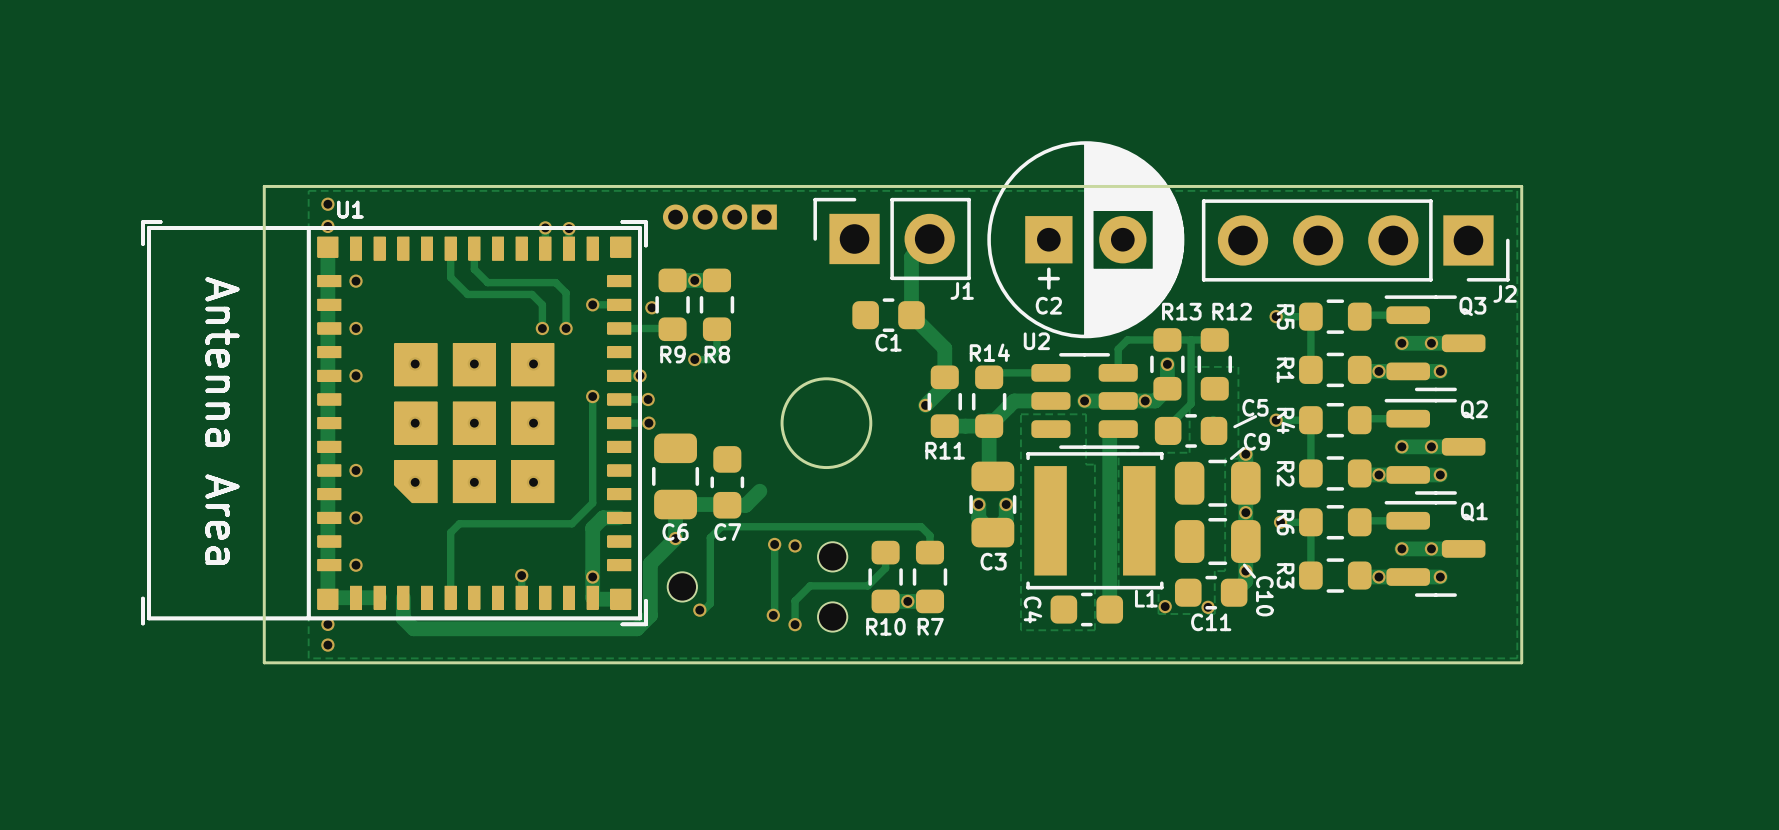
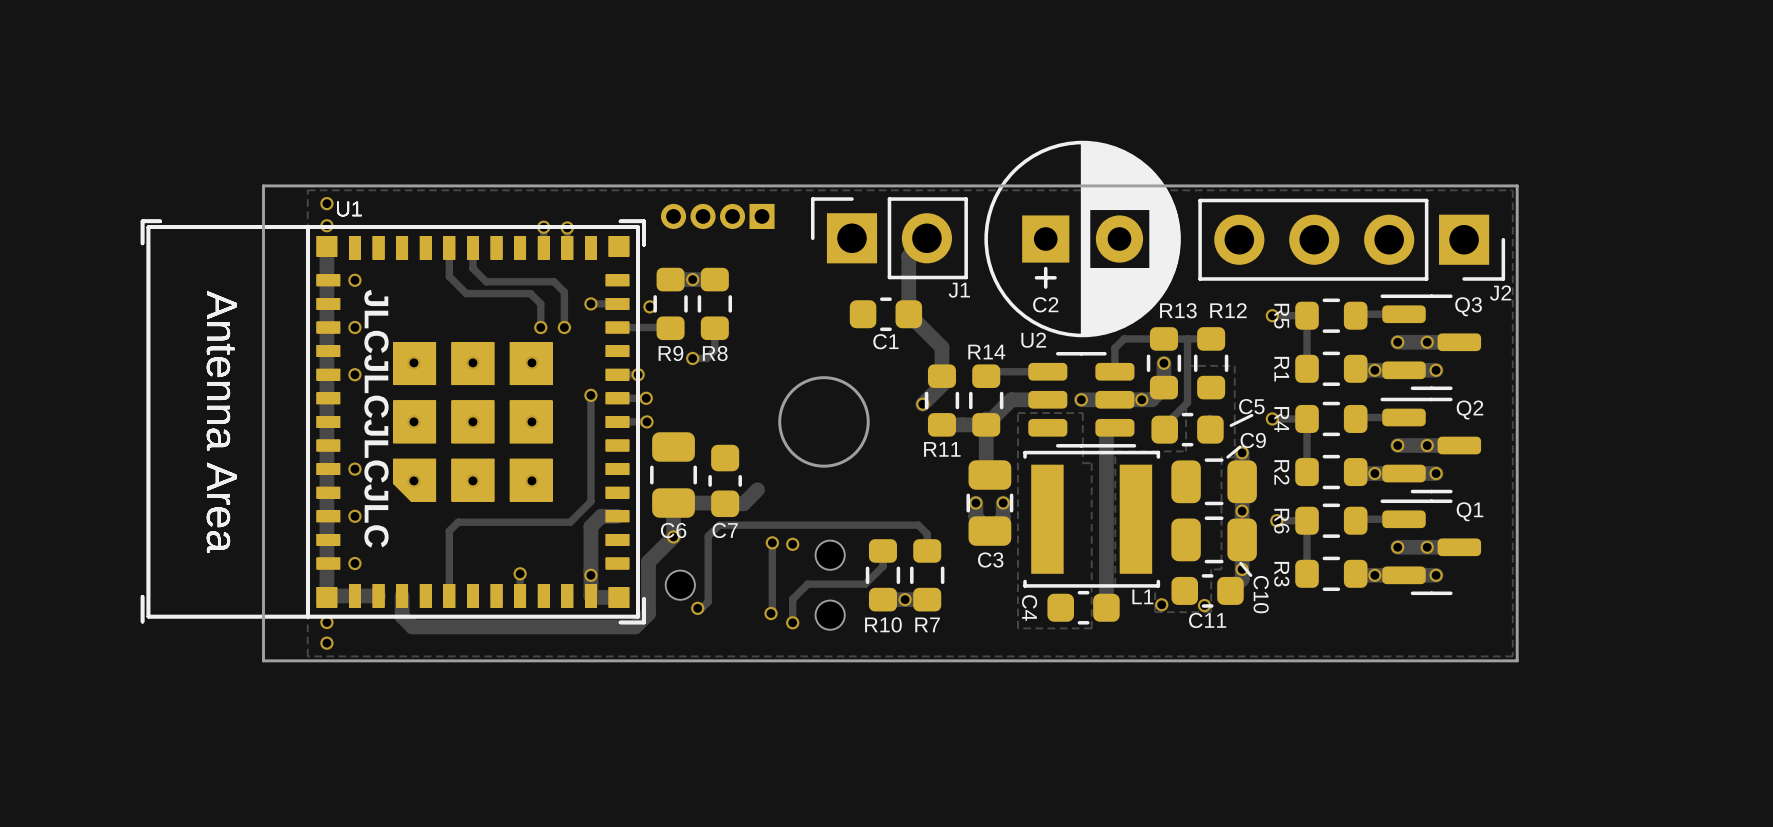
text: none -> JLCJLCJLCJLC (376, 418)

